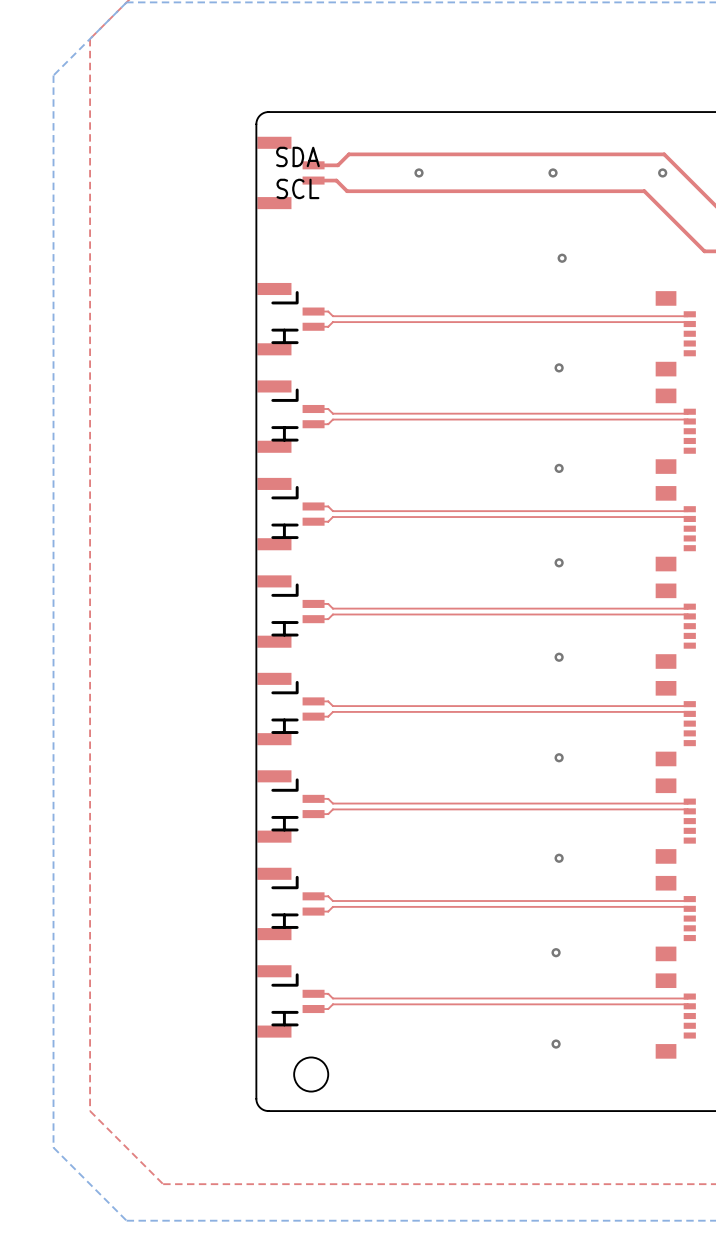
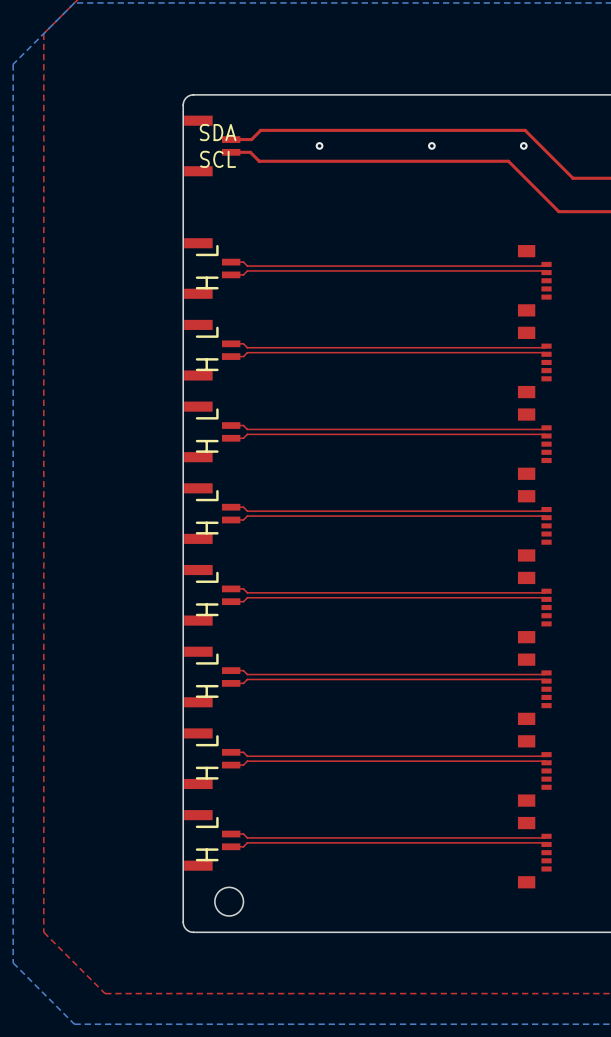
via: (562, 258) -> none
via: (559, 367) -> none
via: (559, 468) -> none
via: (559, 562) -> none
via: (559, 657) -> none
via: (559, 757) -> none
via: (559, 858) -> none
via: (556, 952) -> none
via: (556, 1044) -> none

